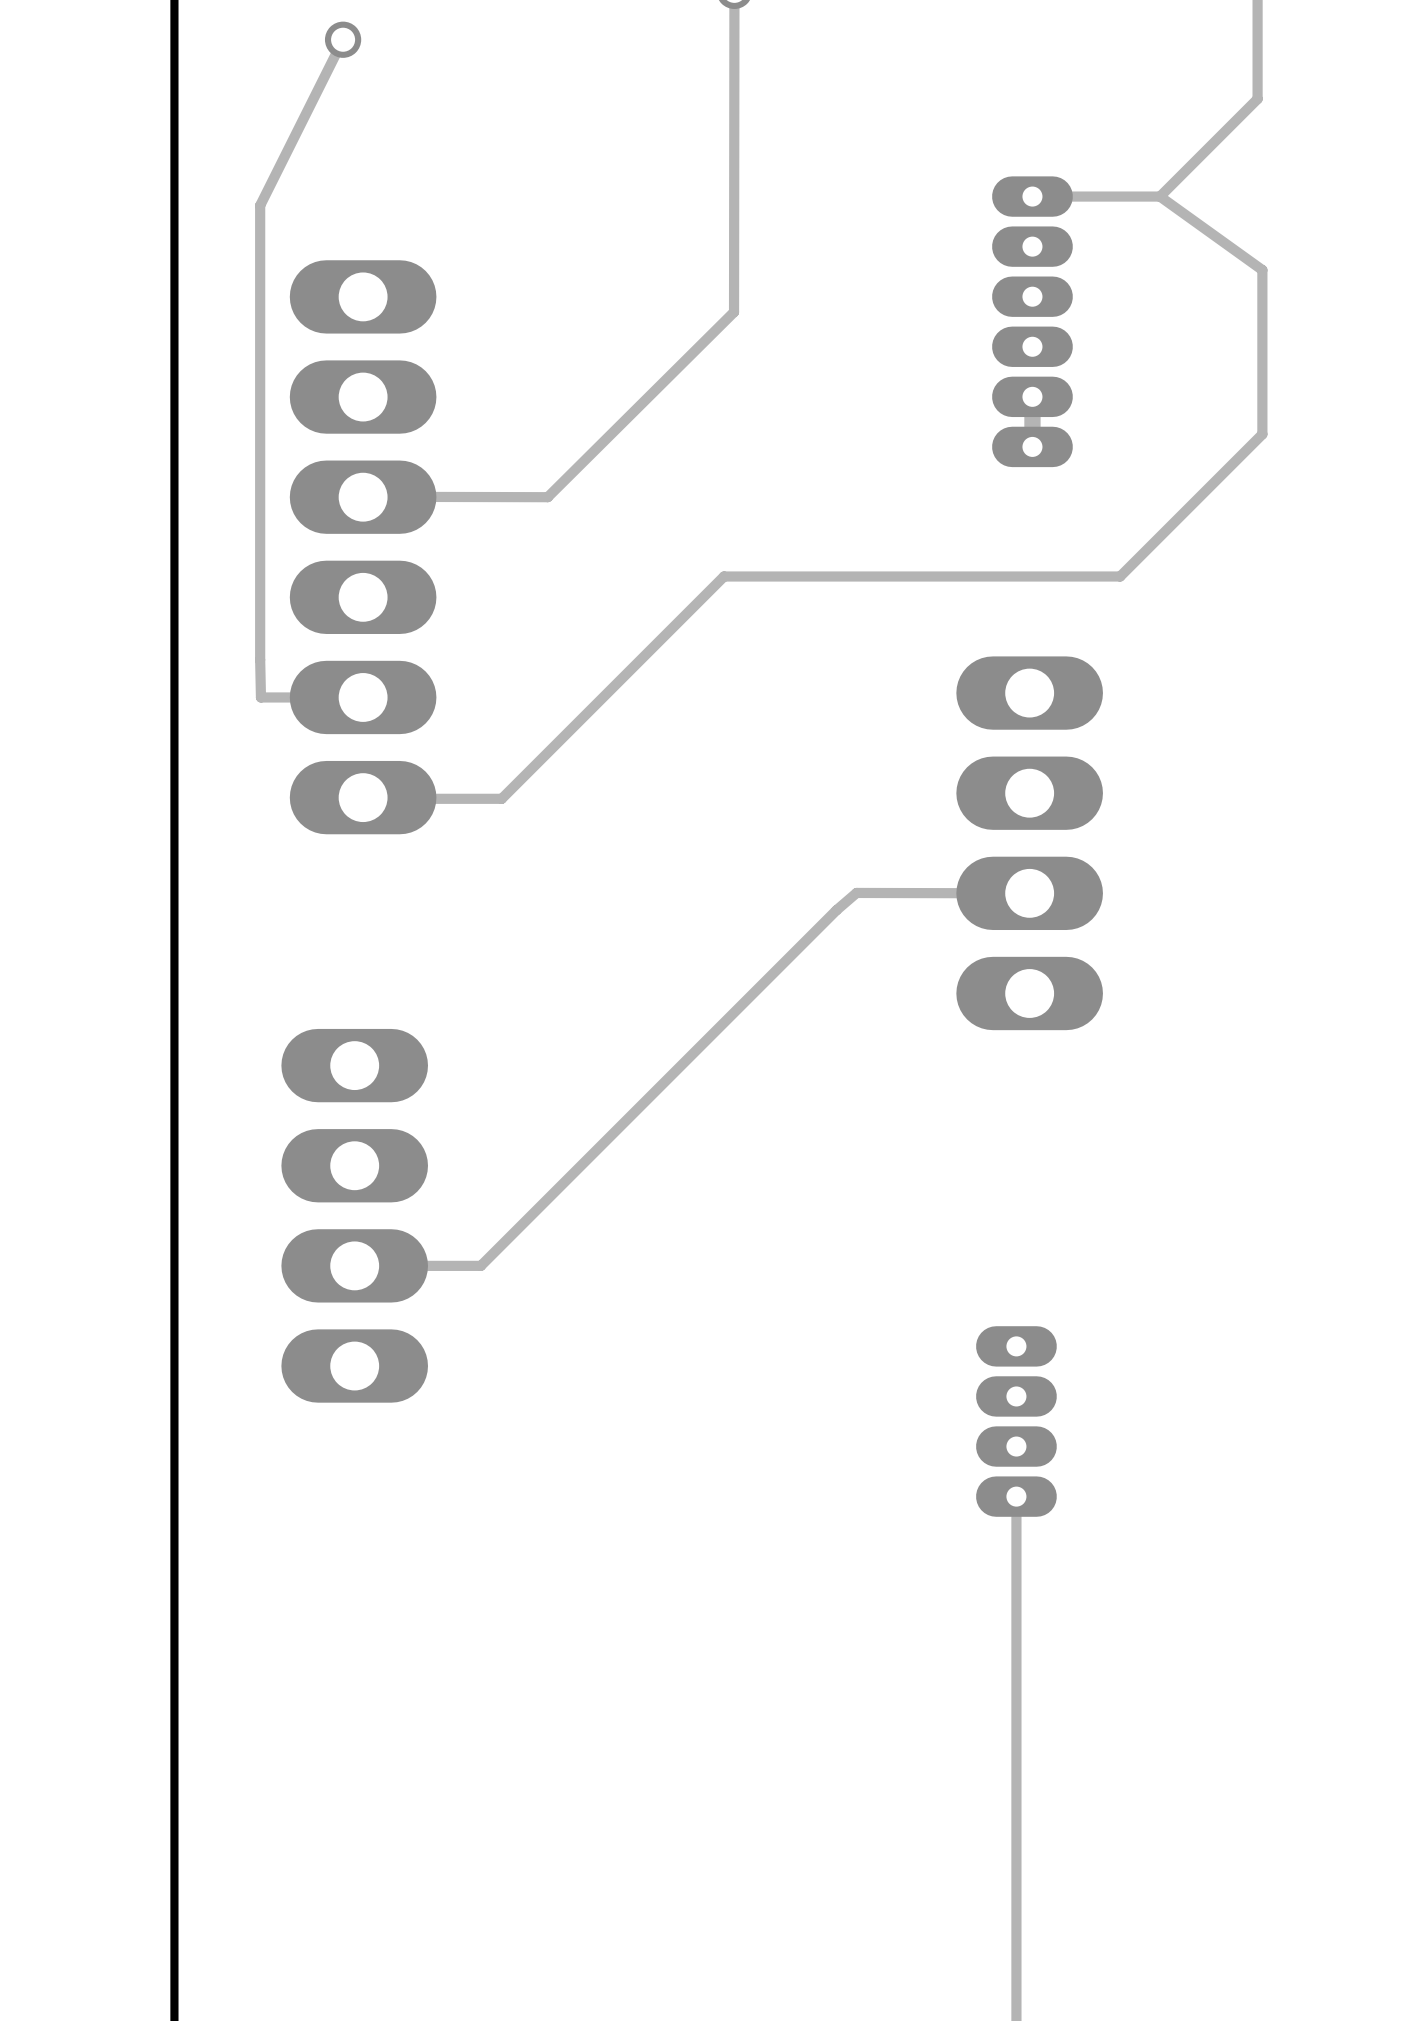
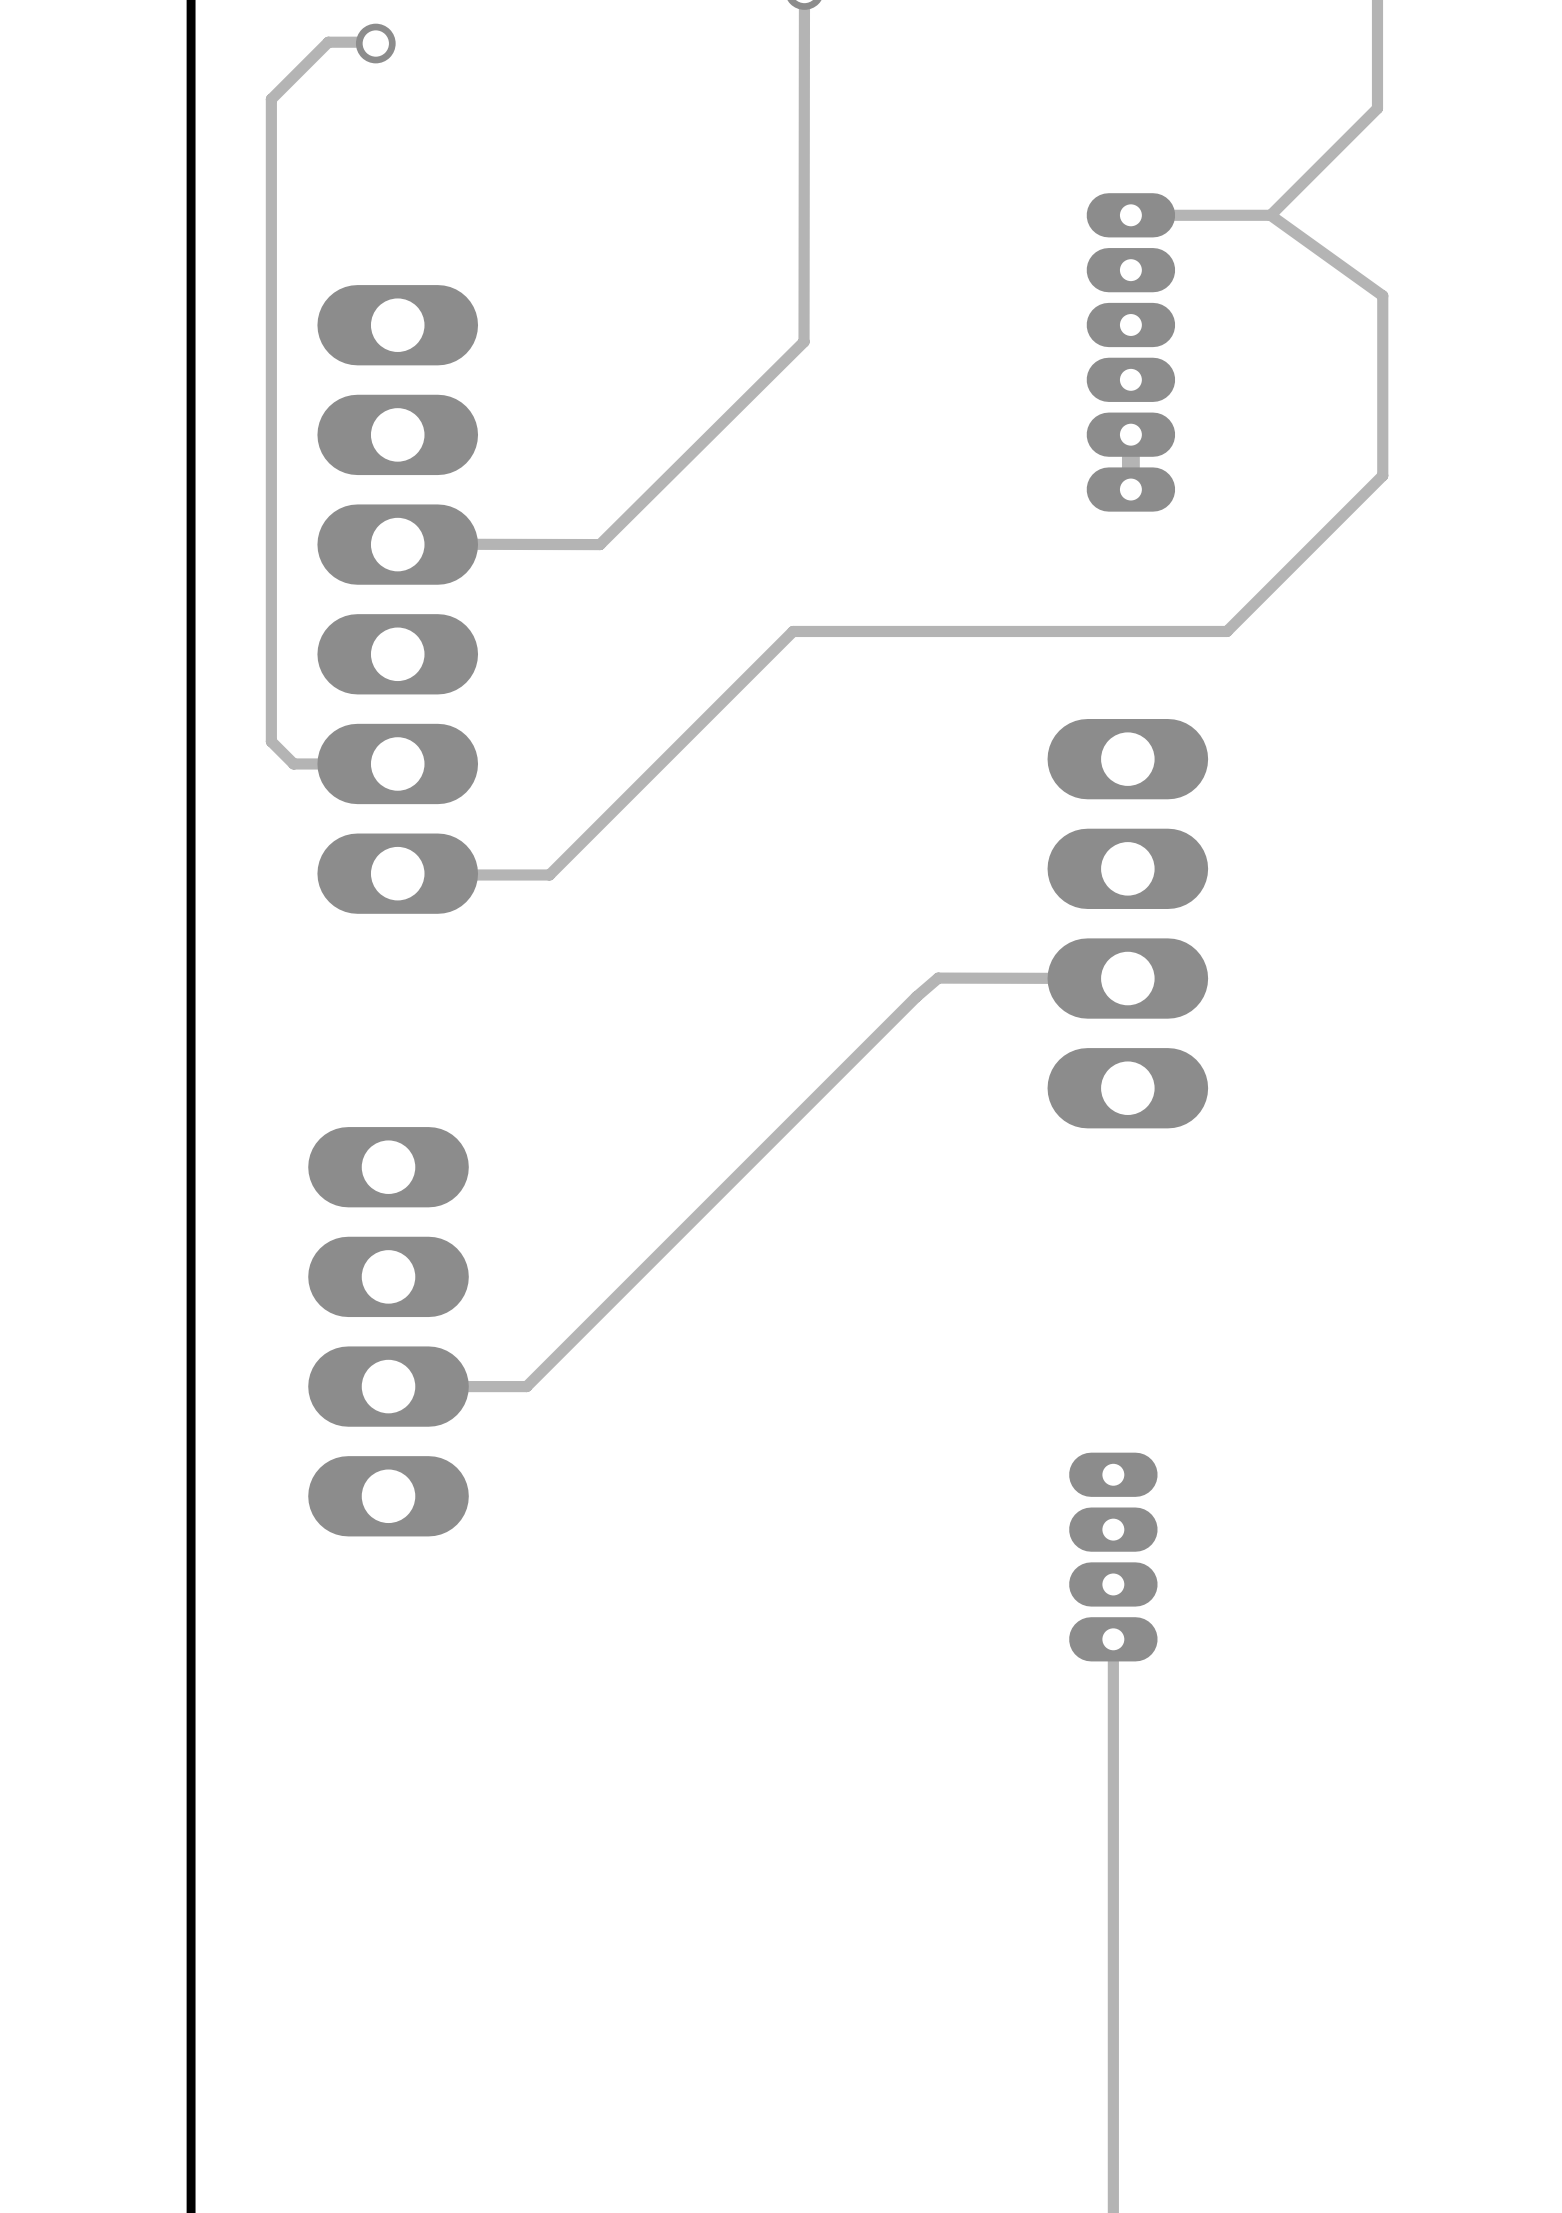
track: (343, 39) (260, 205) (260, 659) (260, 697) (268, 697) -> (375, 42) (328, 42) (271, 99) (271, 741) (293, 763)

